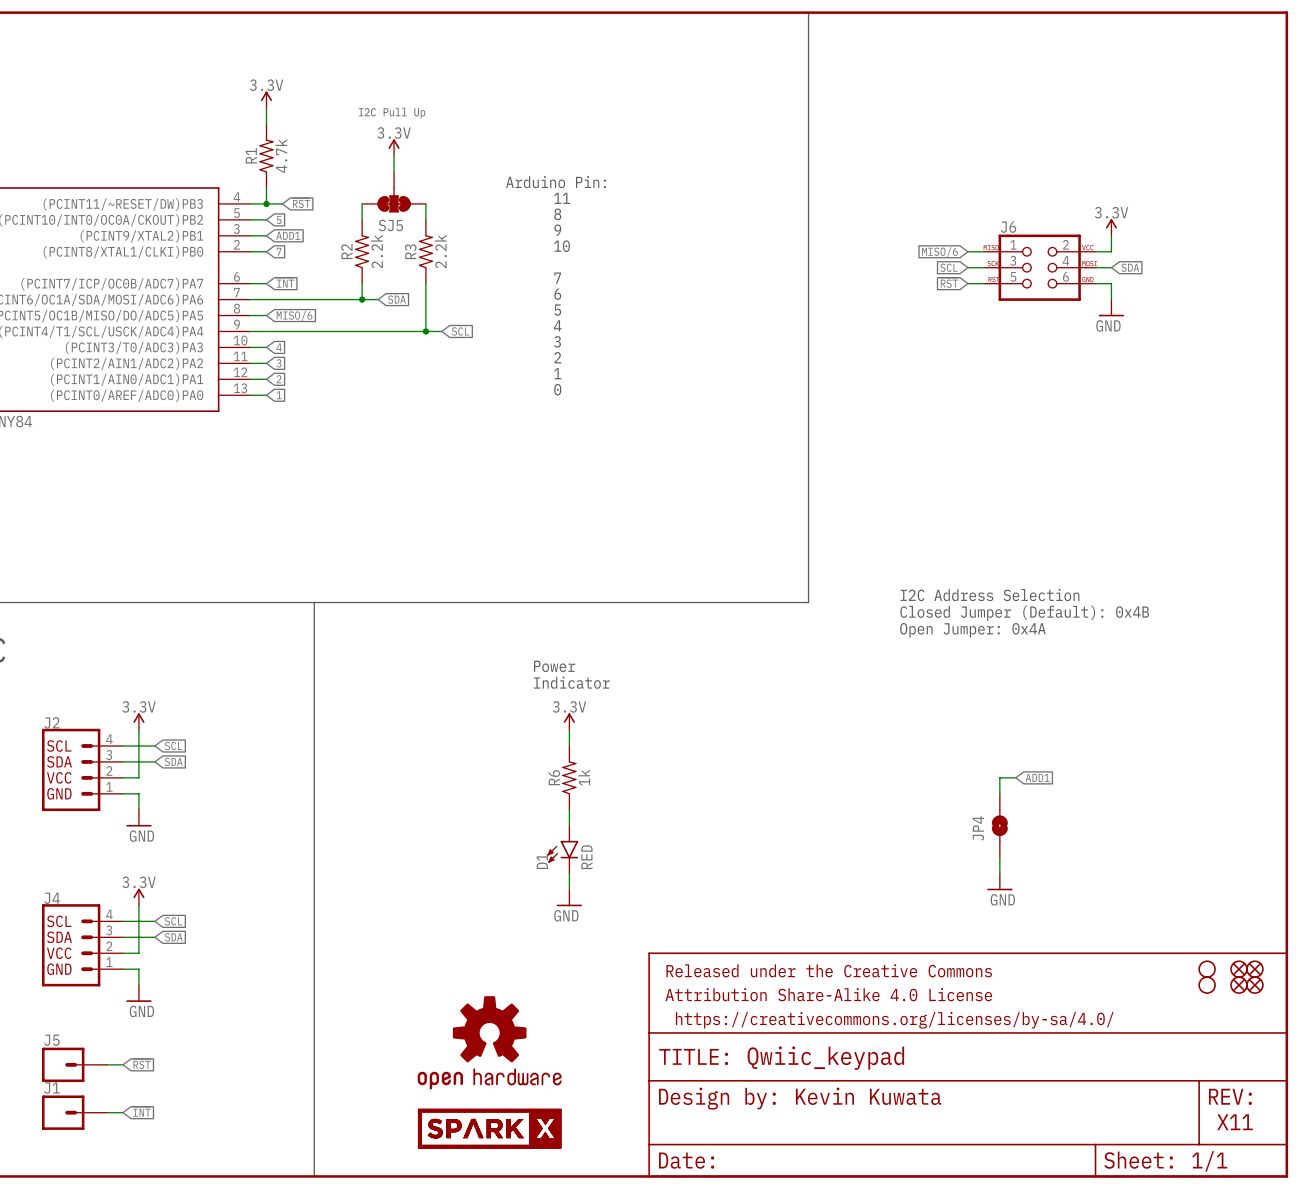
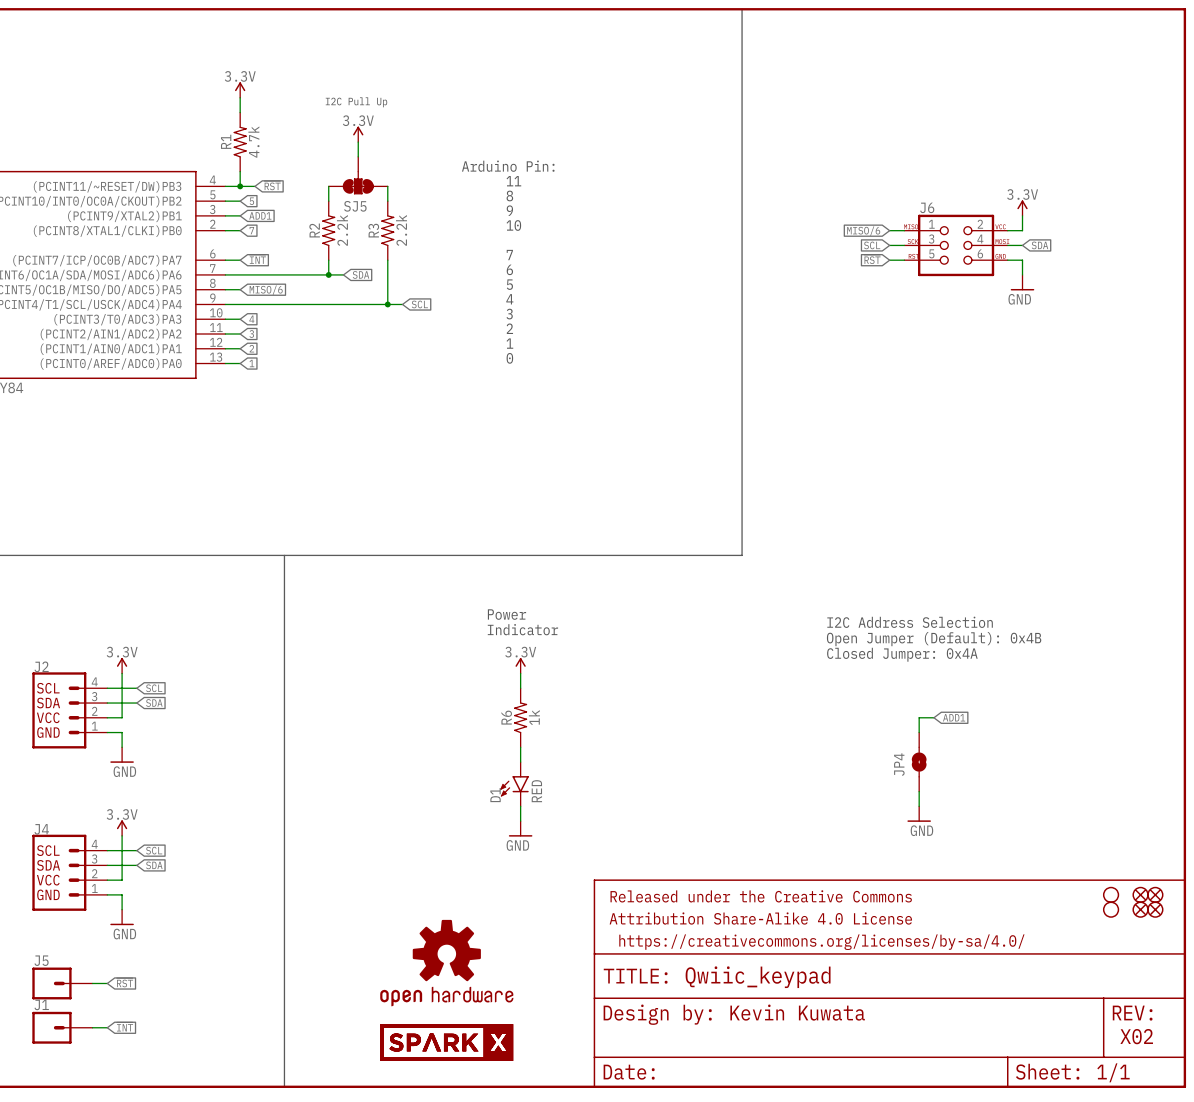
text position: I2C Address Selection (990, 595) -> I2C Address Selection (910, 622)
text: Closed Jumper (Default): 0x4B (1024, 613) -> none
text: Open Jumper: 0x4A (972, 630) -> none
text: none -> Open Jumper (Default): 0x4B (934, 639)
text: none -> Closed Jumper: 0x4A (902, 654)
text: X11 (1234, 1122) -> X02 (1136, 1036)

